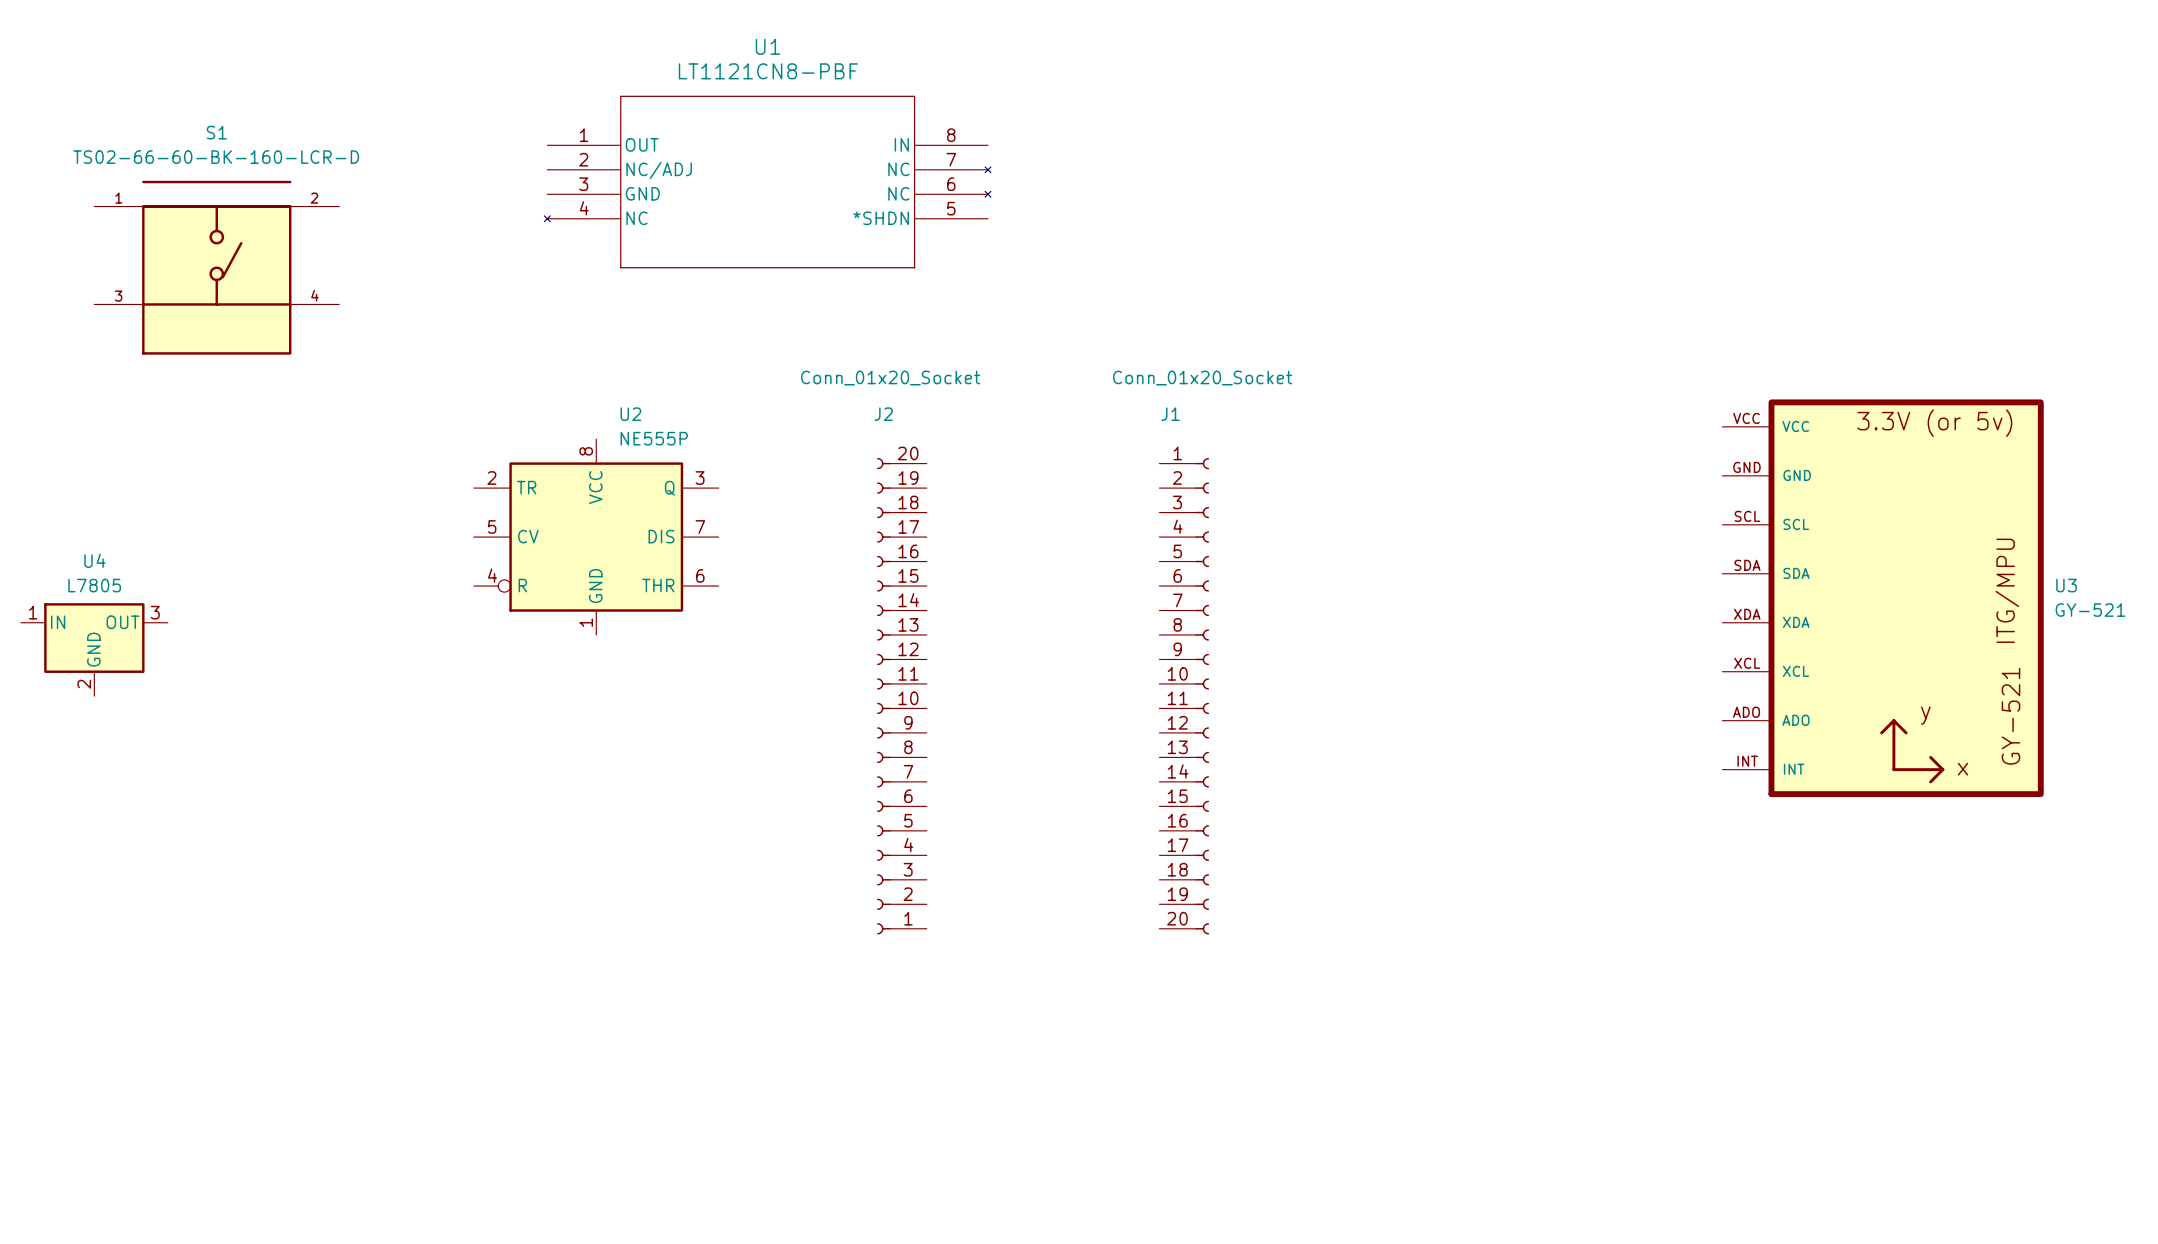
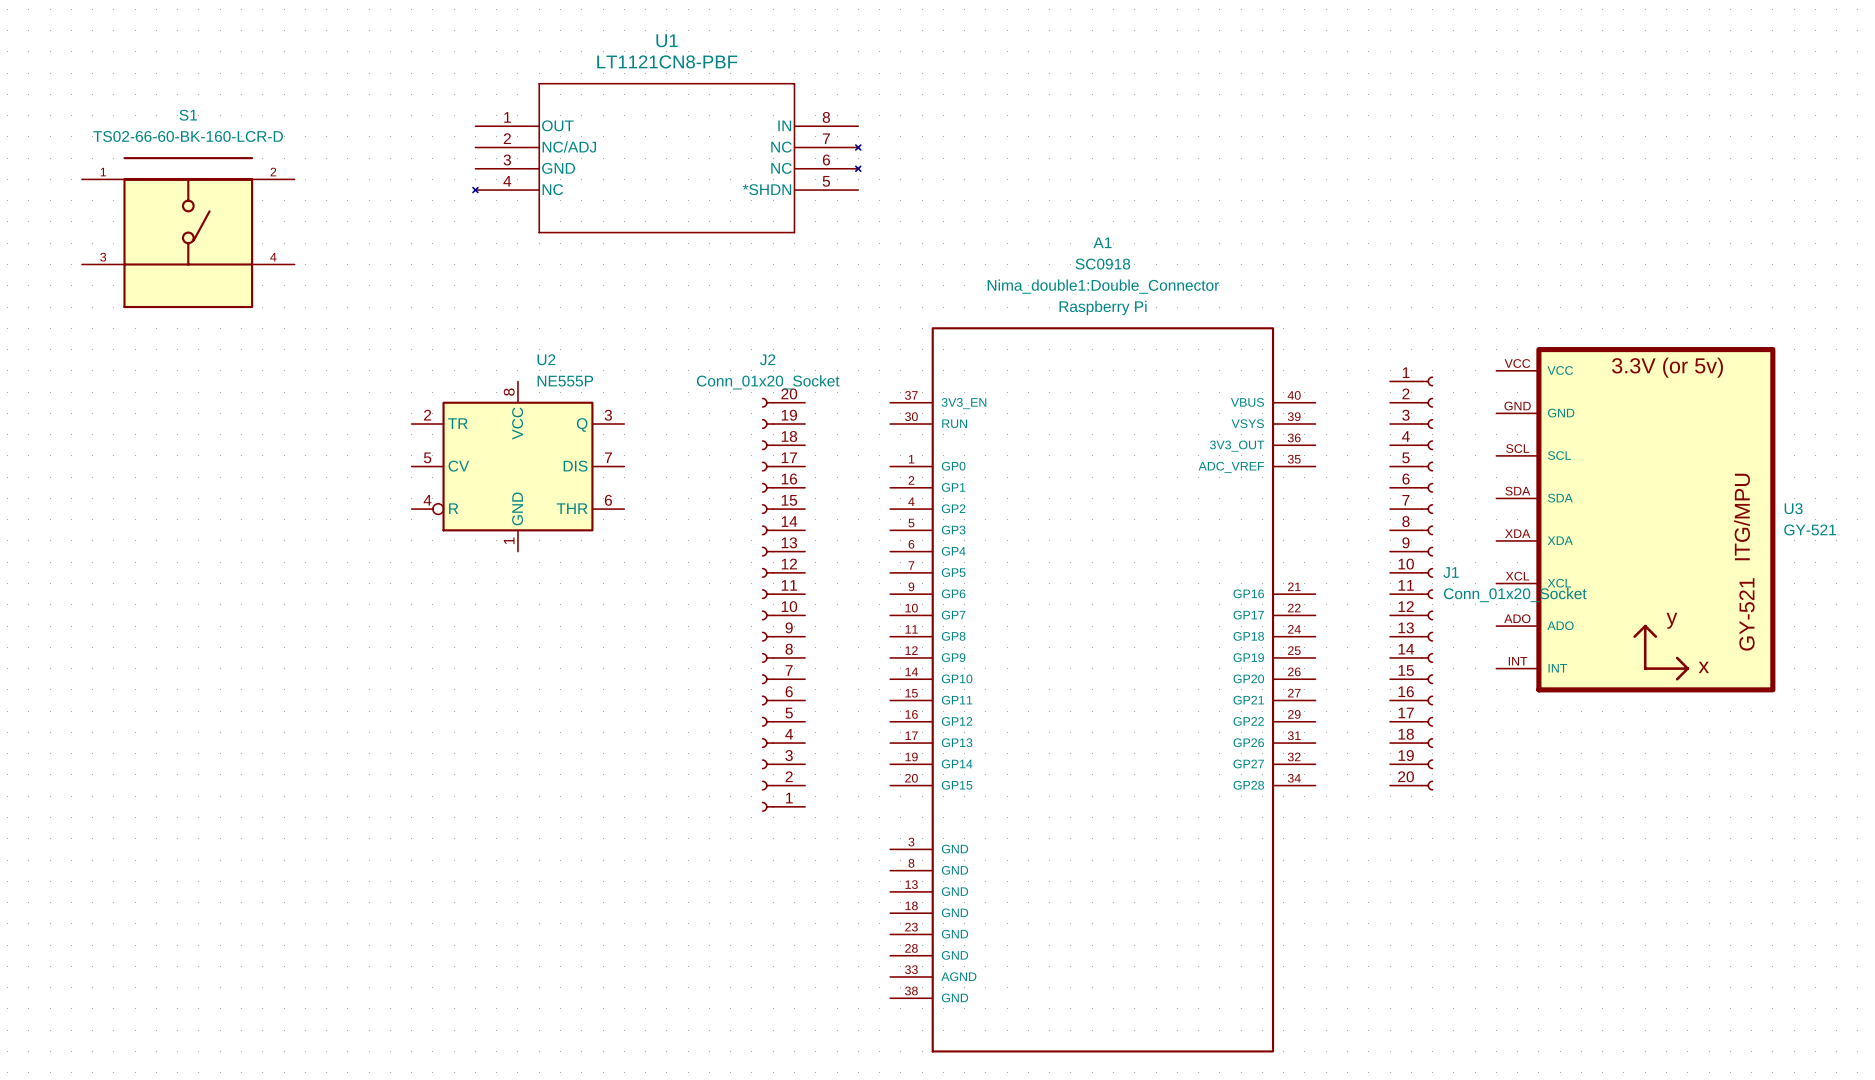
J2 value position: Conn_01x20_Socket (890, 378) -> Conn_01x20_Socket (768, 382)
J1 value position: Conn_01x20_Socket (1202, 378) -> Conn_01x20_Socket (1515, 595)
J1 name position: J1 (1170, 414) -> J1 (1451, 572)
U4: L7805 (94, 649) -> none
J1 position: (1184, 696) -> (1411, 583)
A1: none -> SC0918 (1102, 689)

